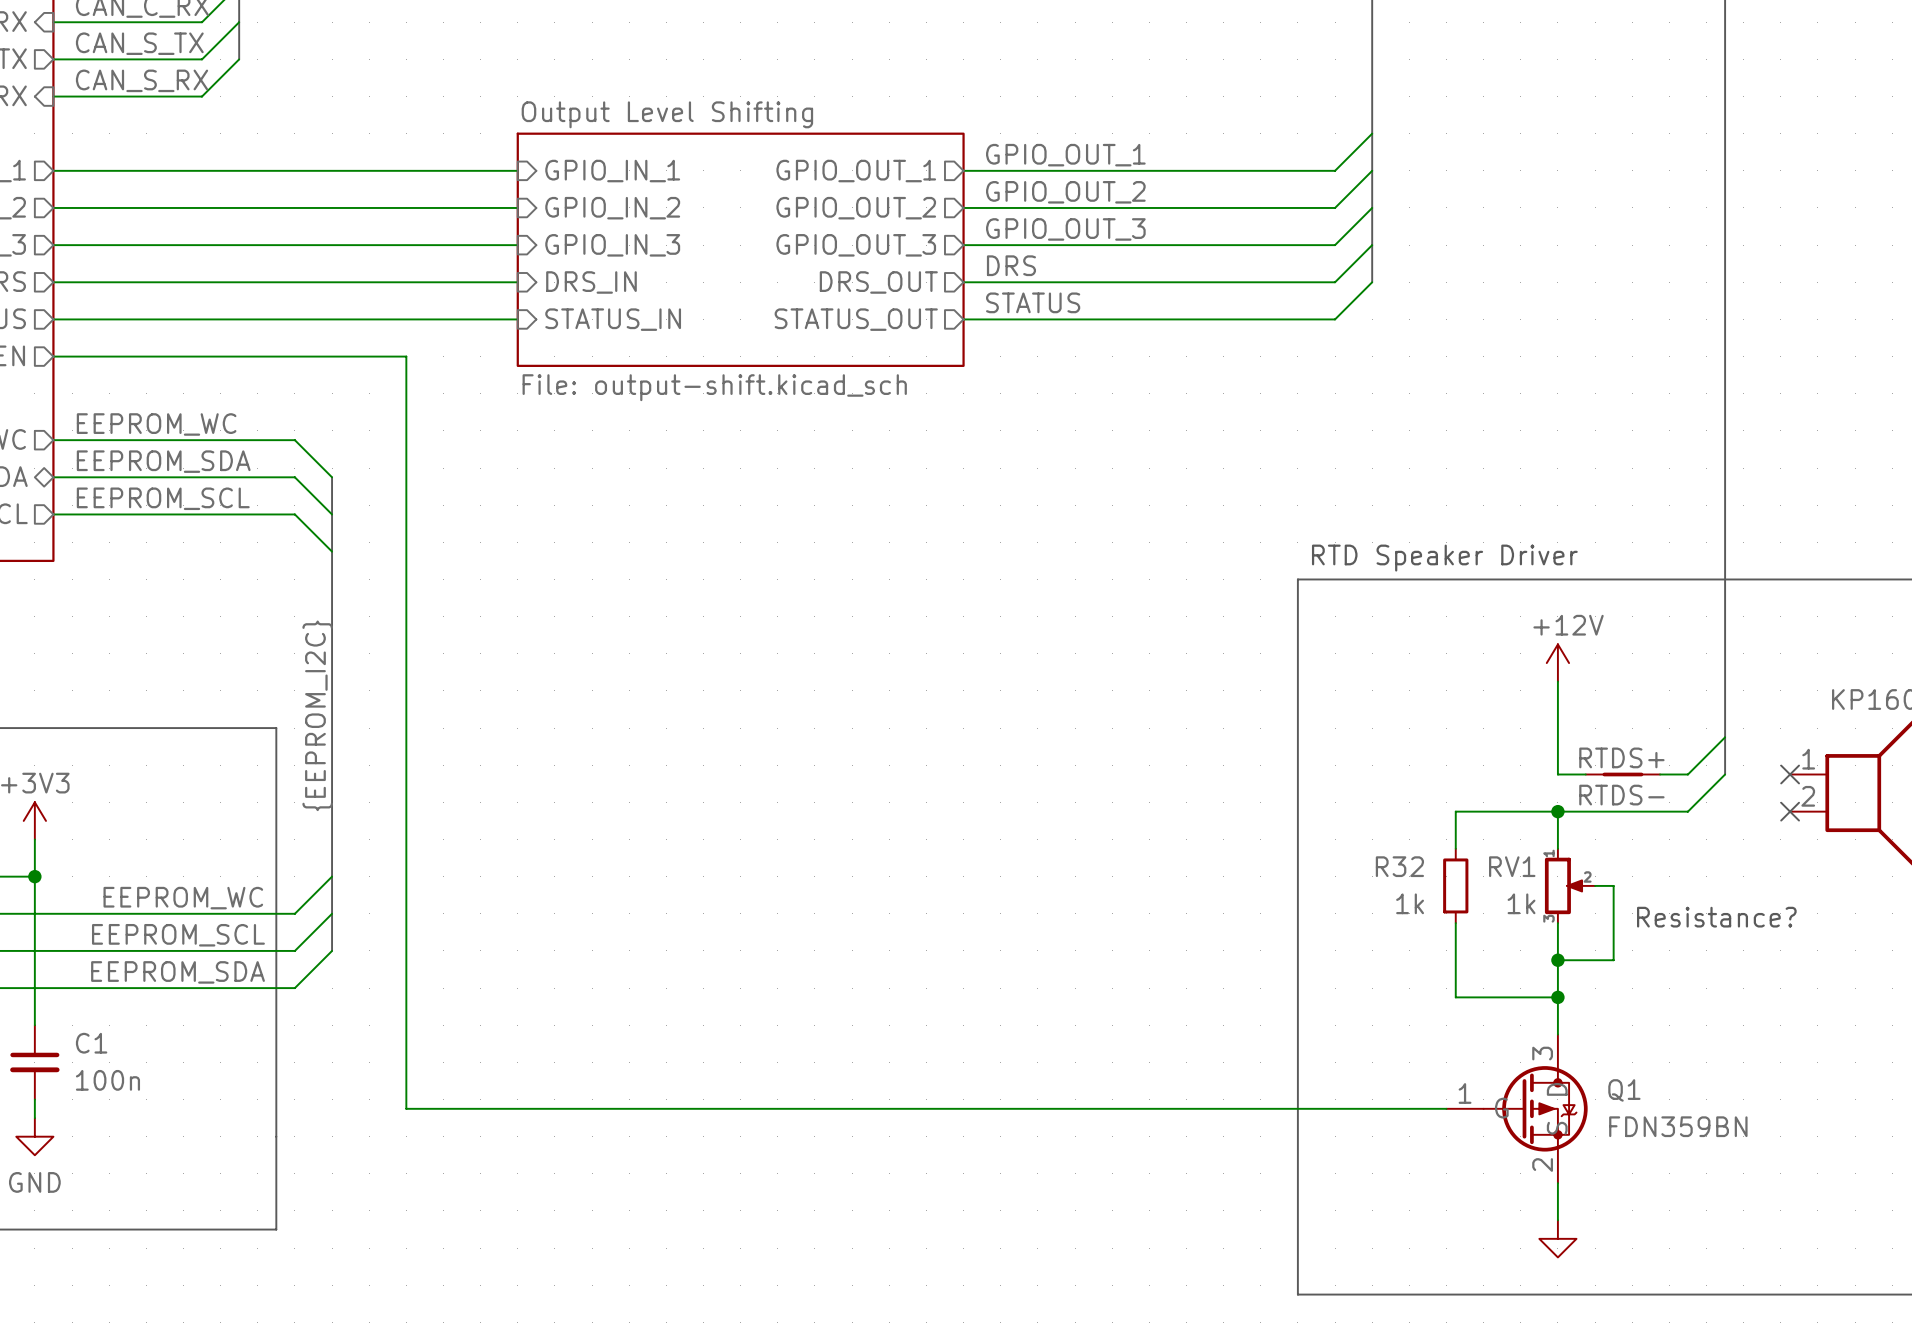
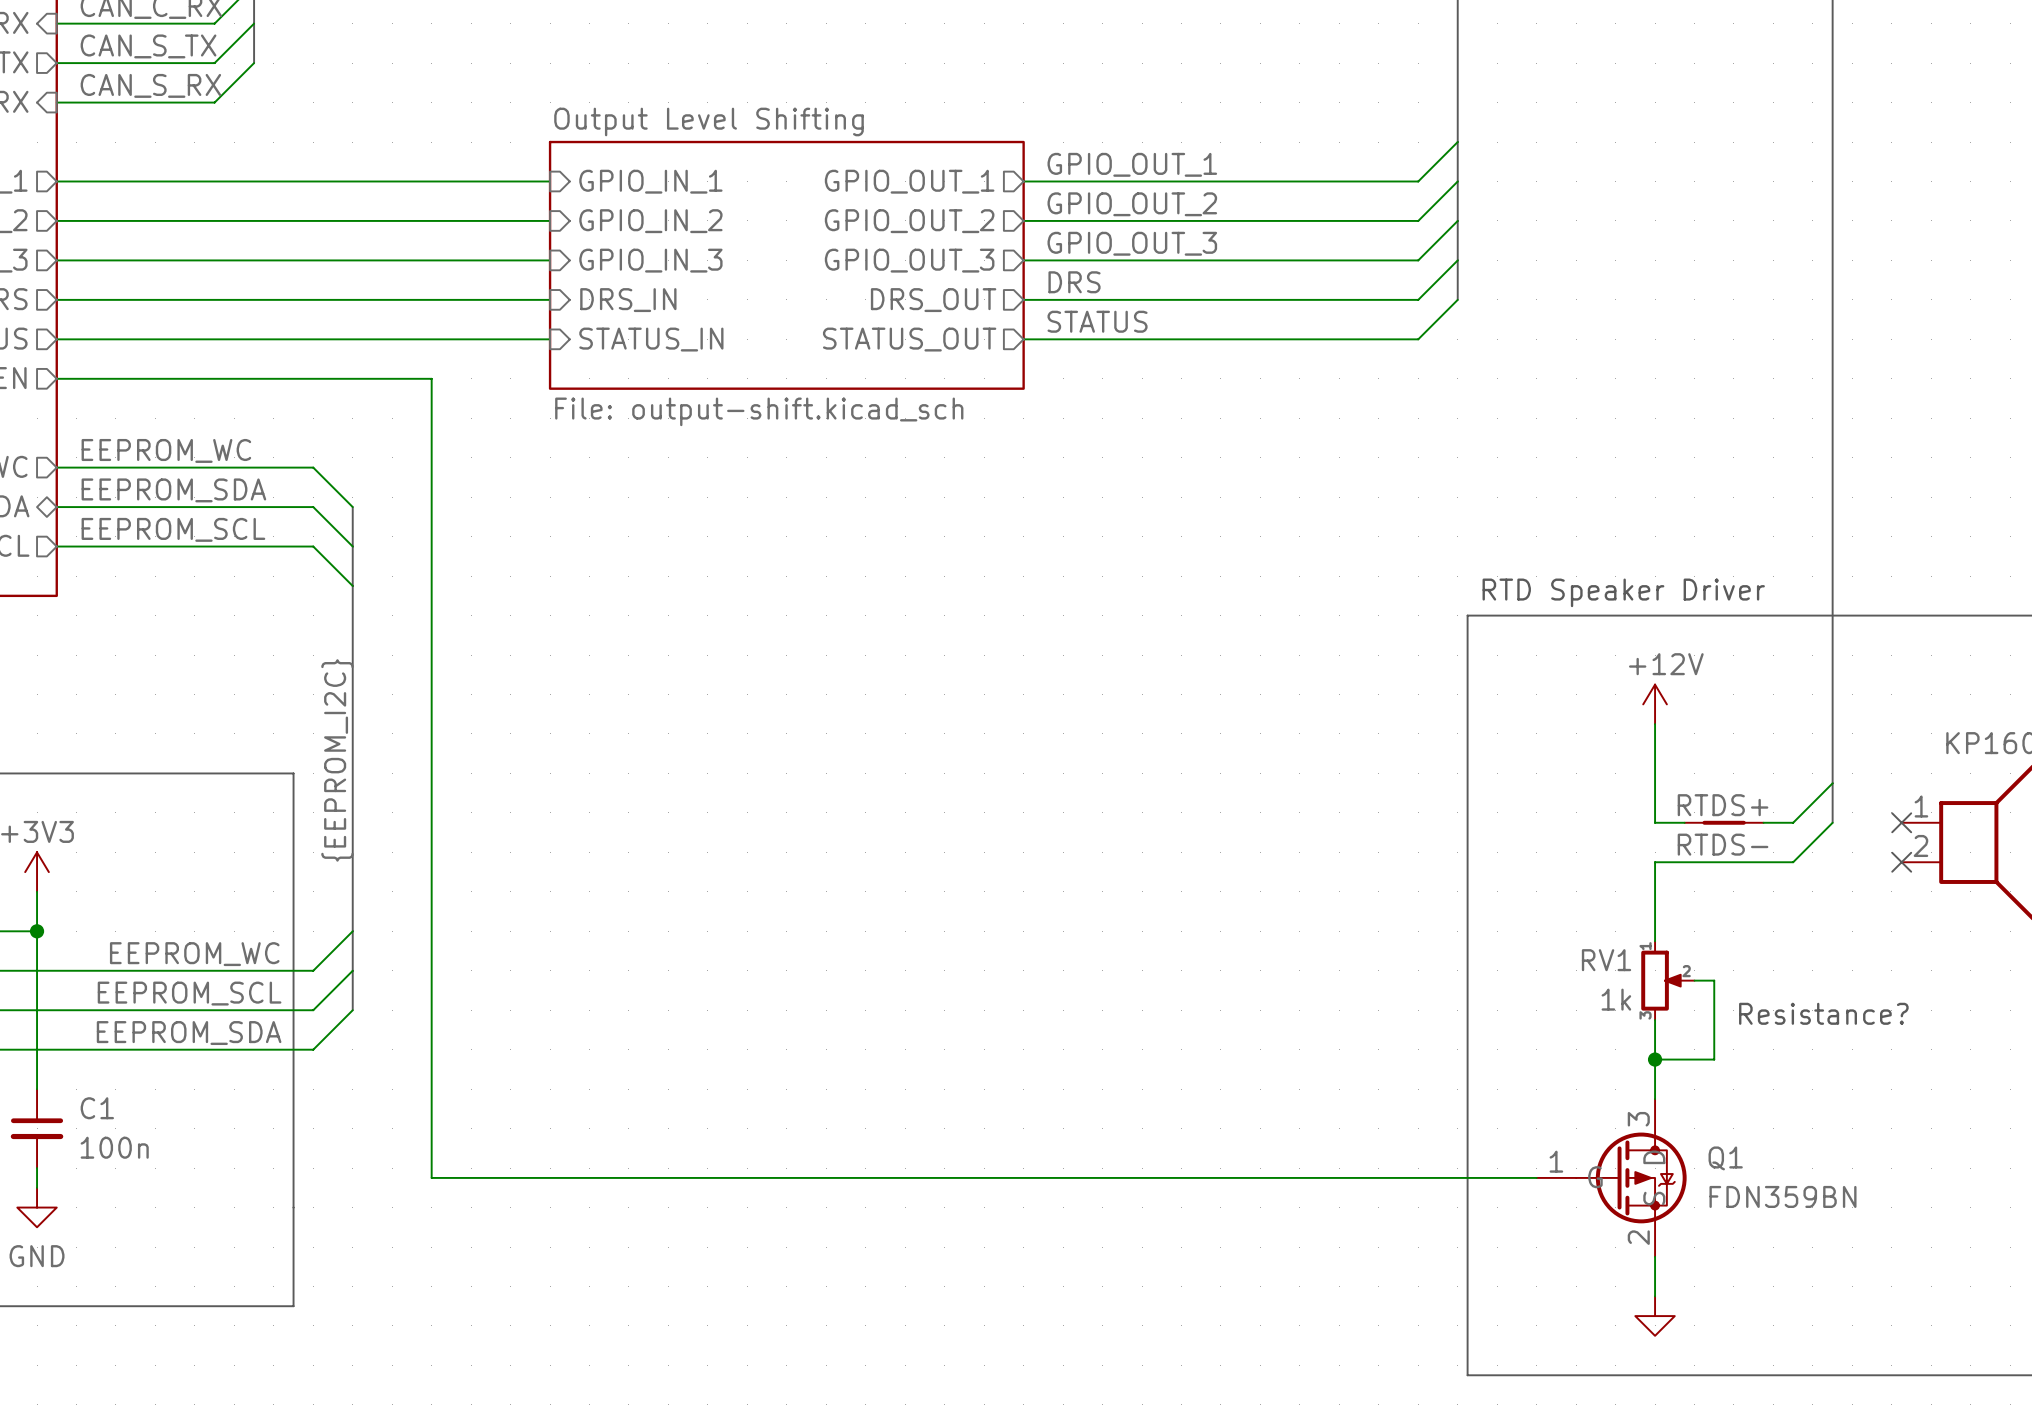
text position: RTD Speaker Driver (1444, 558) -> RTD Speaker Driver (1623, 592)
line: (1381, 579) (1297, 579) (1297, 1294) (1381, 1294) -> (1467, 615) (1467, 1375)
wire: (1557, 811) (1455, 811) (1455, 848) -> none
junction: (1557, 811) -> none
wire: none -> (1655, 901) (1655, 941)
R32: 1k (1455, 885) -> none
RV1 position: (1570, 885) -> (1667, 980)
wire: (1595, 885) (1613, 885) (1613, 923) -> (1694, 980) (1714, 980)
text position: Resistance? (1716, 917) -> Resistance? (1823, 1013)
wire: (1455, 923) (1455, 997) (1557, 997) -> none
wire: (1557, 923) (1557, 960) (1613, 960) -> (1655, 1059) (1714, 1059) (1714, 1020)
junction: (1557, 960) -> none

